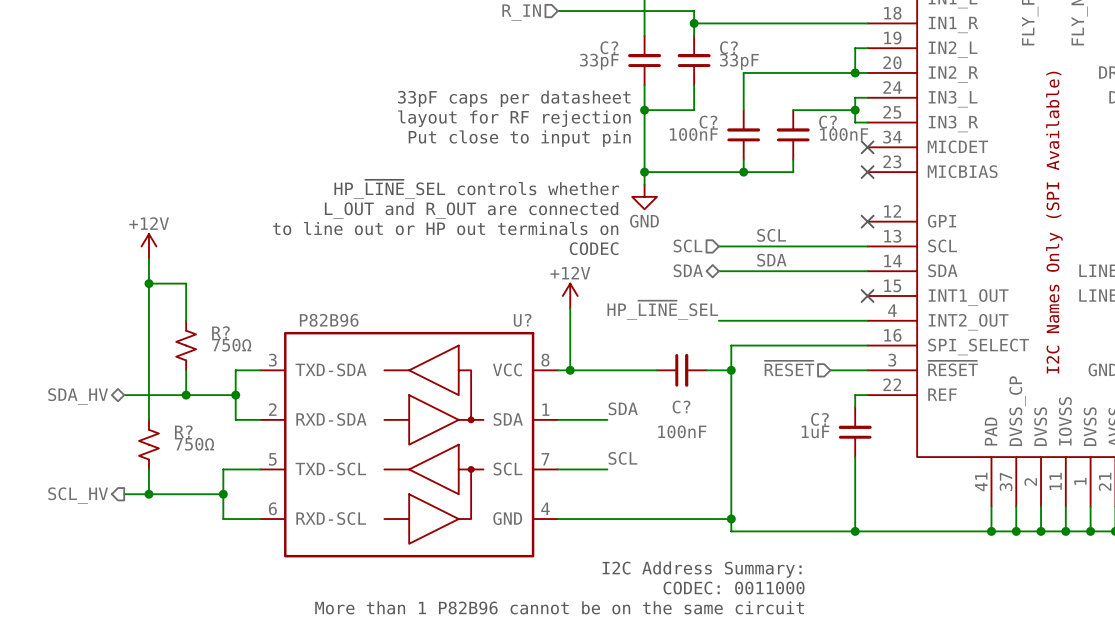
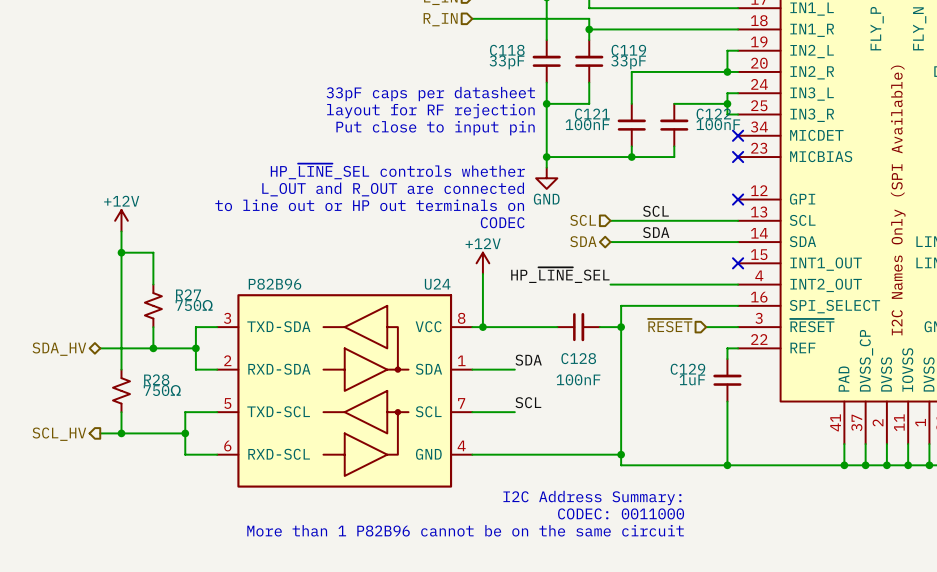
C? name: C? (609, 47) -> C118 (507, 50)
C? name: C? (728, 47) -> C119 (628, 50)
C? name: C? (708, 122) -> C121 (592, 114)
C? name: C? (828, 122) -> C122 (713, 114)
U? name: U? (522, 320) -> U24 (437, 284)
R? name: R? (220, 332) -> R27 (188, 294)
C? name: C? (681, 407) -> C128 (578, 358)
C? name: C? (819, 419) -> C129 (687, 369)
R? name: R? (183, 431) -> R28 (156, 379)

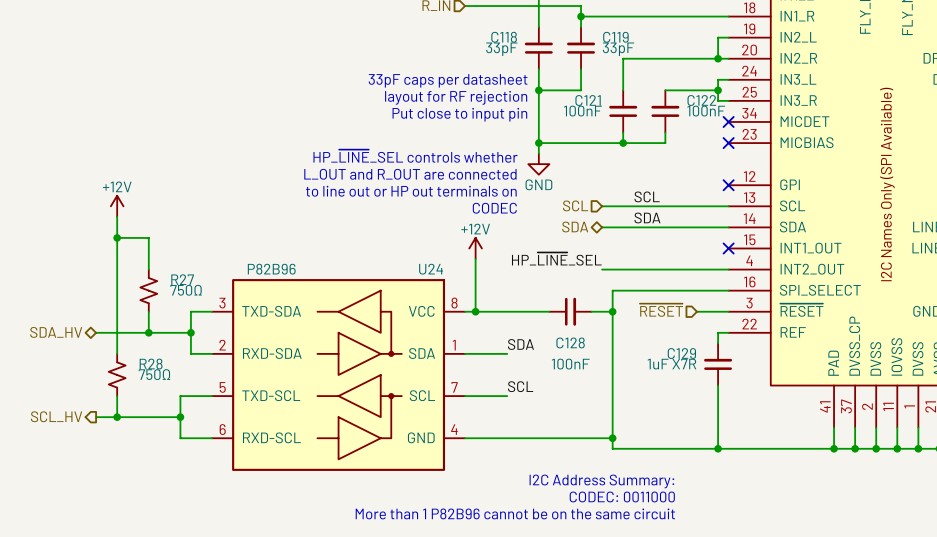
C129 value: 1uF (692, 379) -> 1uF X7R (671, 364)

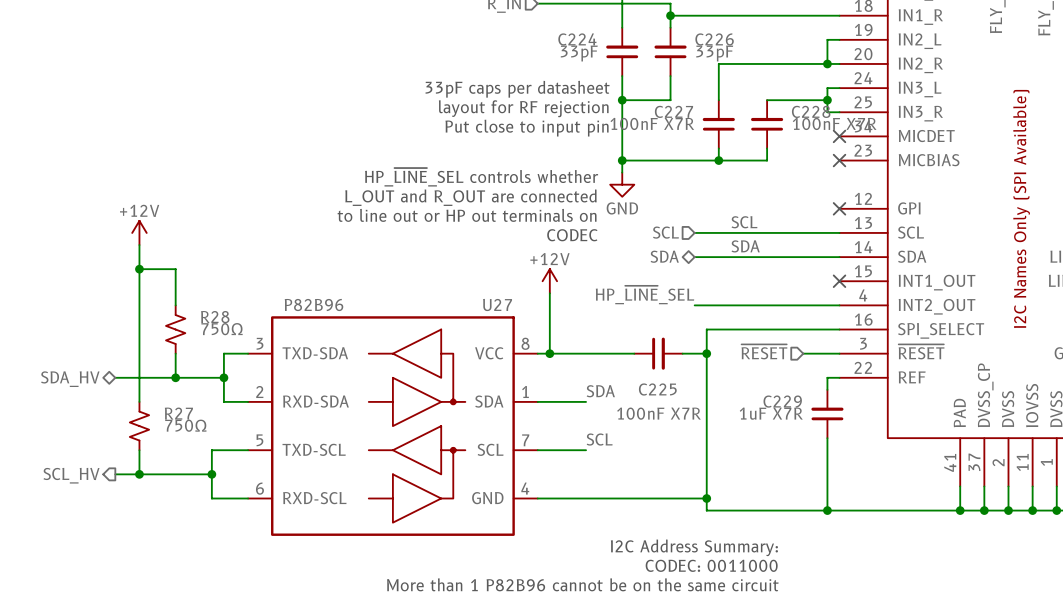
C118 name: C118 (504, 37) -> C224 (577, 39)
C119 name: C119 (615, 37) -> C226 (714, 39)
C121 name: C121 (588, 100) -> C227 (673, 111)
C122 name: C122 (701, 100) -> C228 (811, 111)
C121 value: 100nF (582, 111) -> 100nF X7R (652, 123)
C122 value: 100nF (706, 111) -> 100nF X7R (834, 123)
U24 name: U24 (431, 269) -> U27 (497, 305)
R27 name: R27 (182, 279) -> R28 (215, 317)
C128 name: C128 (570, 342) -> C225 (657, 389)
C129 name: C129 (681, 353) -> C229 (782, 401)
R28 name: R28 (151, 364) -> R27 (178, 413)
C128 value: 100nF (570, 364) -> 100nF X7R (658, 413)

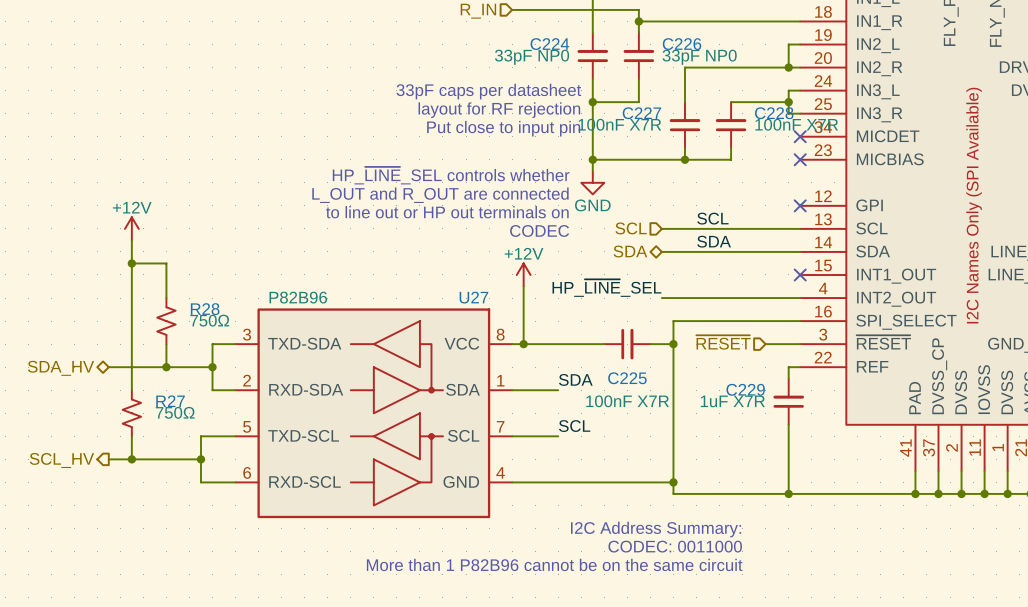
C224 value: 33pF (579, 53) -> 33pF NP0 (532, 57)
C226 value: 33pF (714, 53) -> 33pF NP0 (699, 57)

